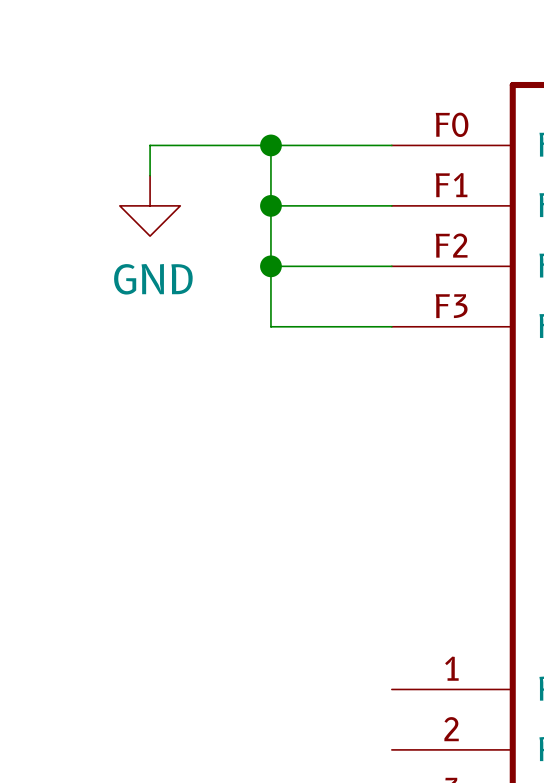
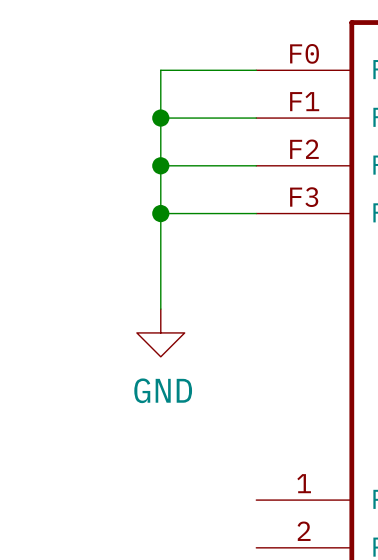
wire: (270, 145) (150, 145) (150, 175) -> none
junction: (270, 145) -> none
power symbol position: GND (150, 205) -> GND (160, 332)
wire: none -> (160, 213) (160, 309)
junction: none -> (160, 213)

